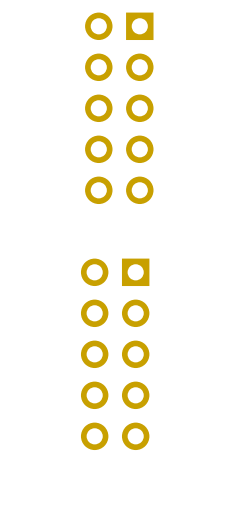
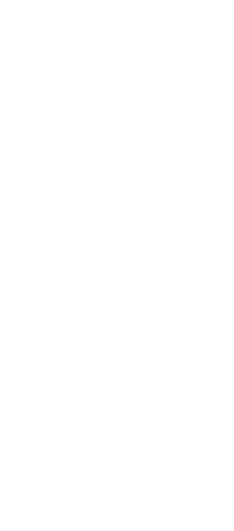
part: (119, 108) -> none
part: (115, 354) -> none

